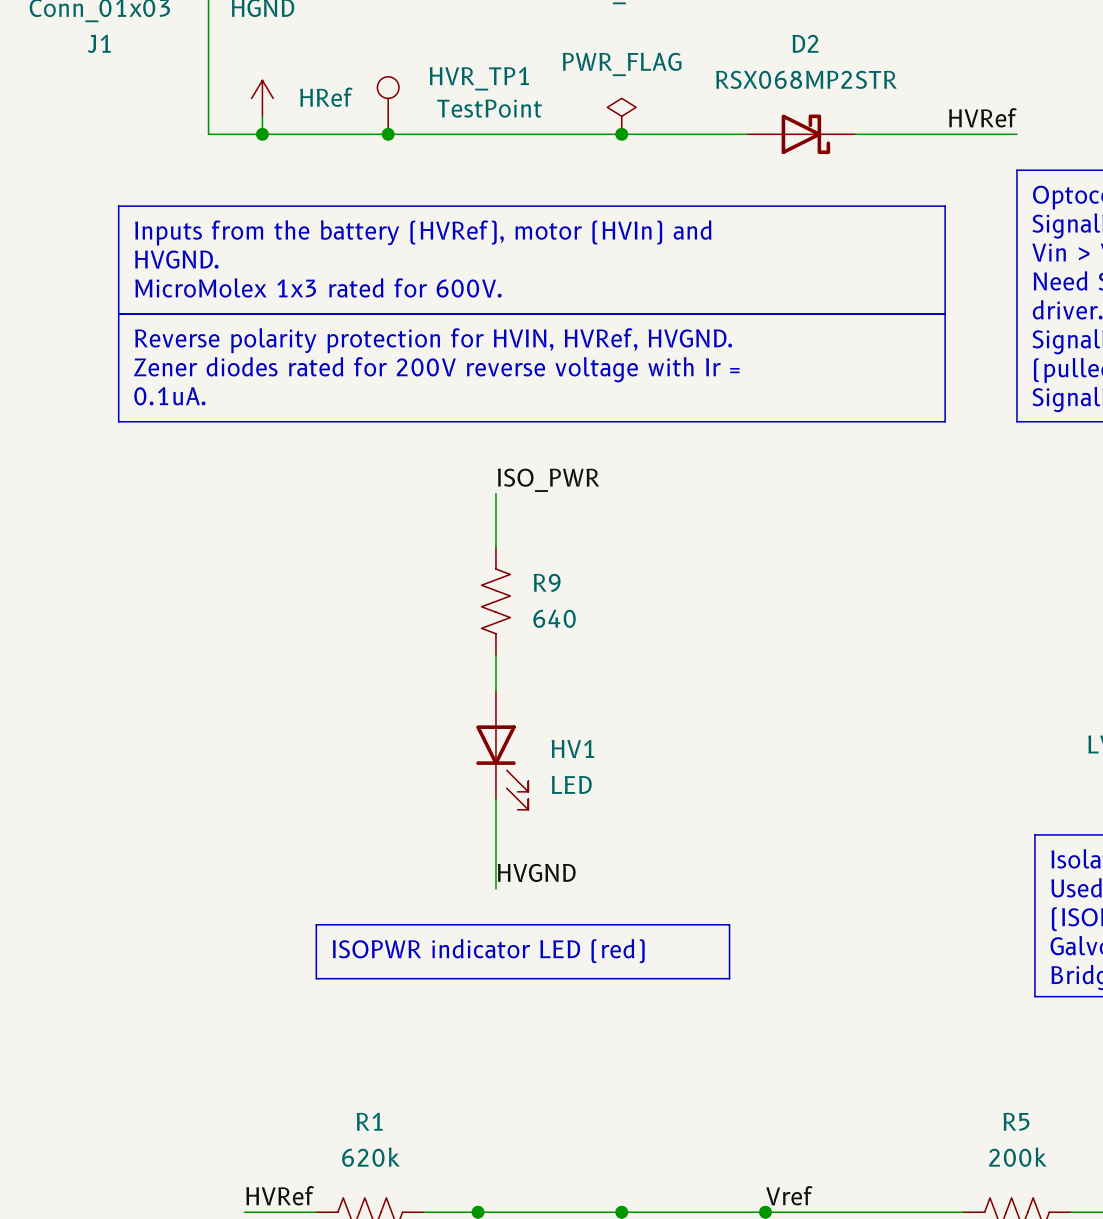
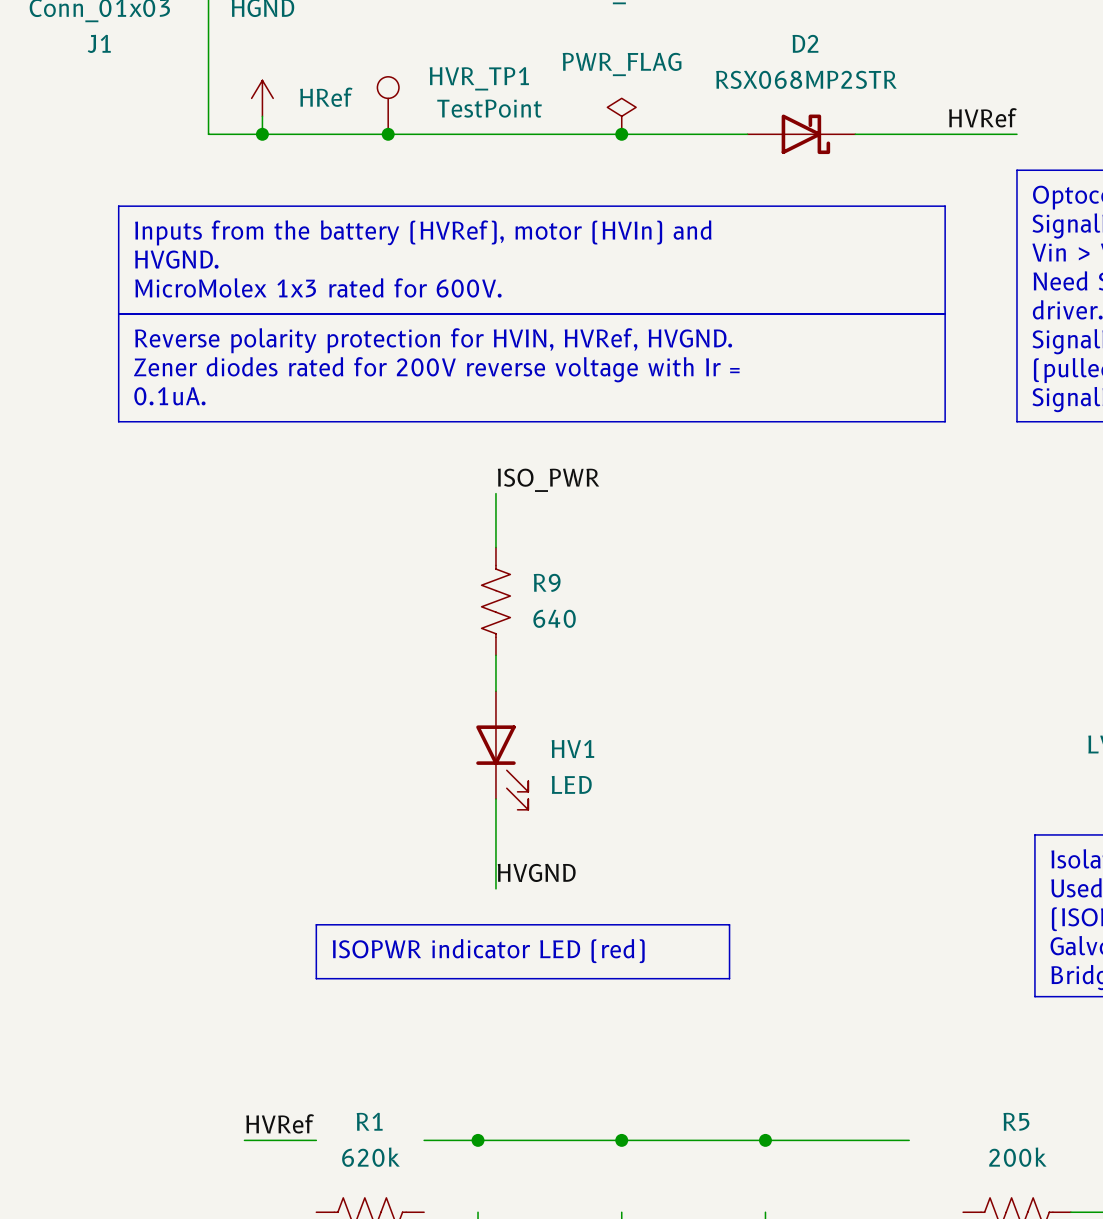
wire: none -> (424, 1140) (909, 1140)
junction: none -> (478, 1140)
junction: none -> (765, 1140)
label position: HVRef (280, 1195) -> HVRef (280, 1123)
label: Vref (789, 1195) -> none
wire: (244, 1212) (316, 1212) -> (244, 1140) (316, 1140)
wire: (424, 1212) (963, 1212) -> none
junction: (478, 1212) -> none
junction position: (621, 1212) -> (621, 1140)
junction: (765, 1212) -> none

